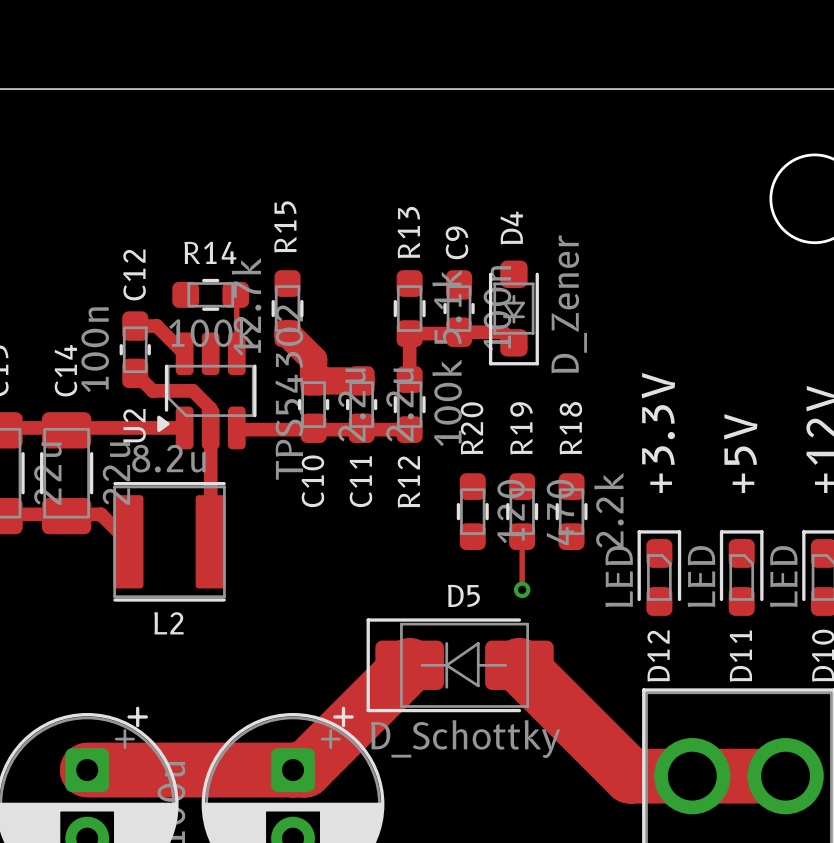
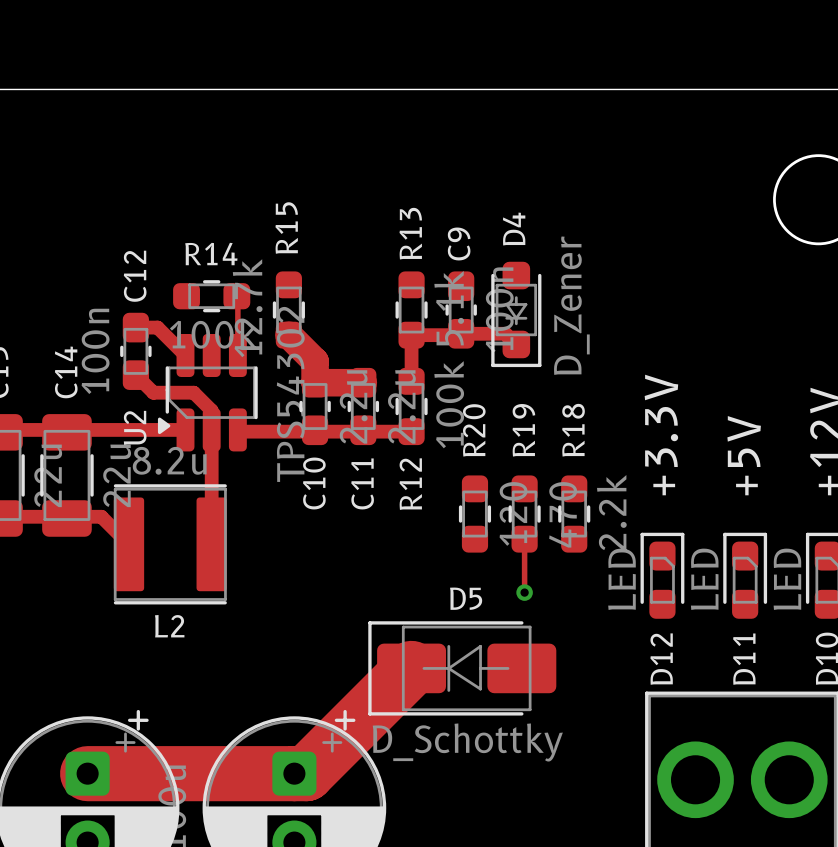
track: (519, 665) (630, 776) (785, 776) -> none

